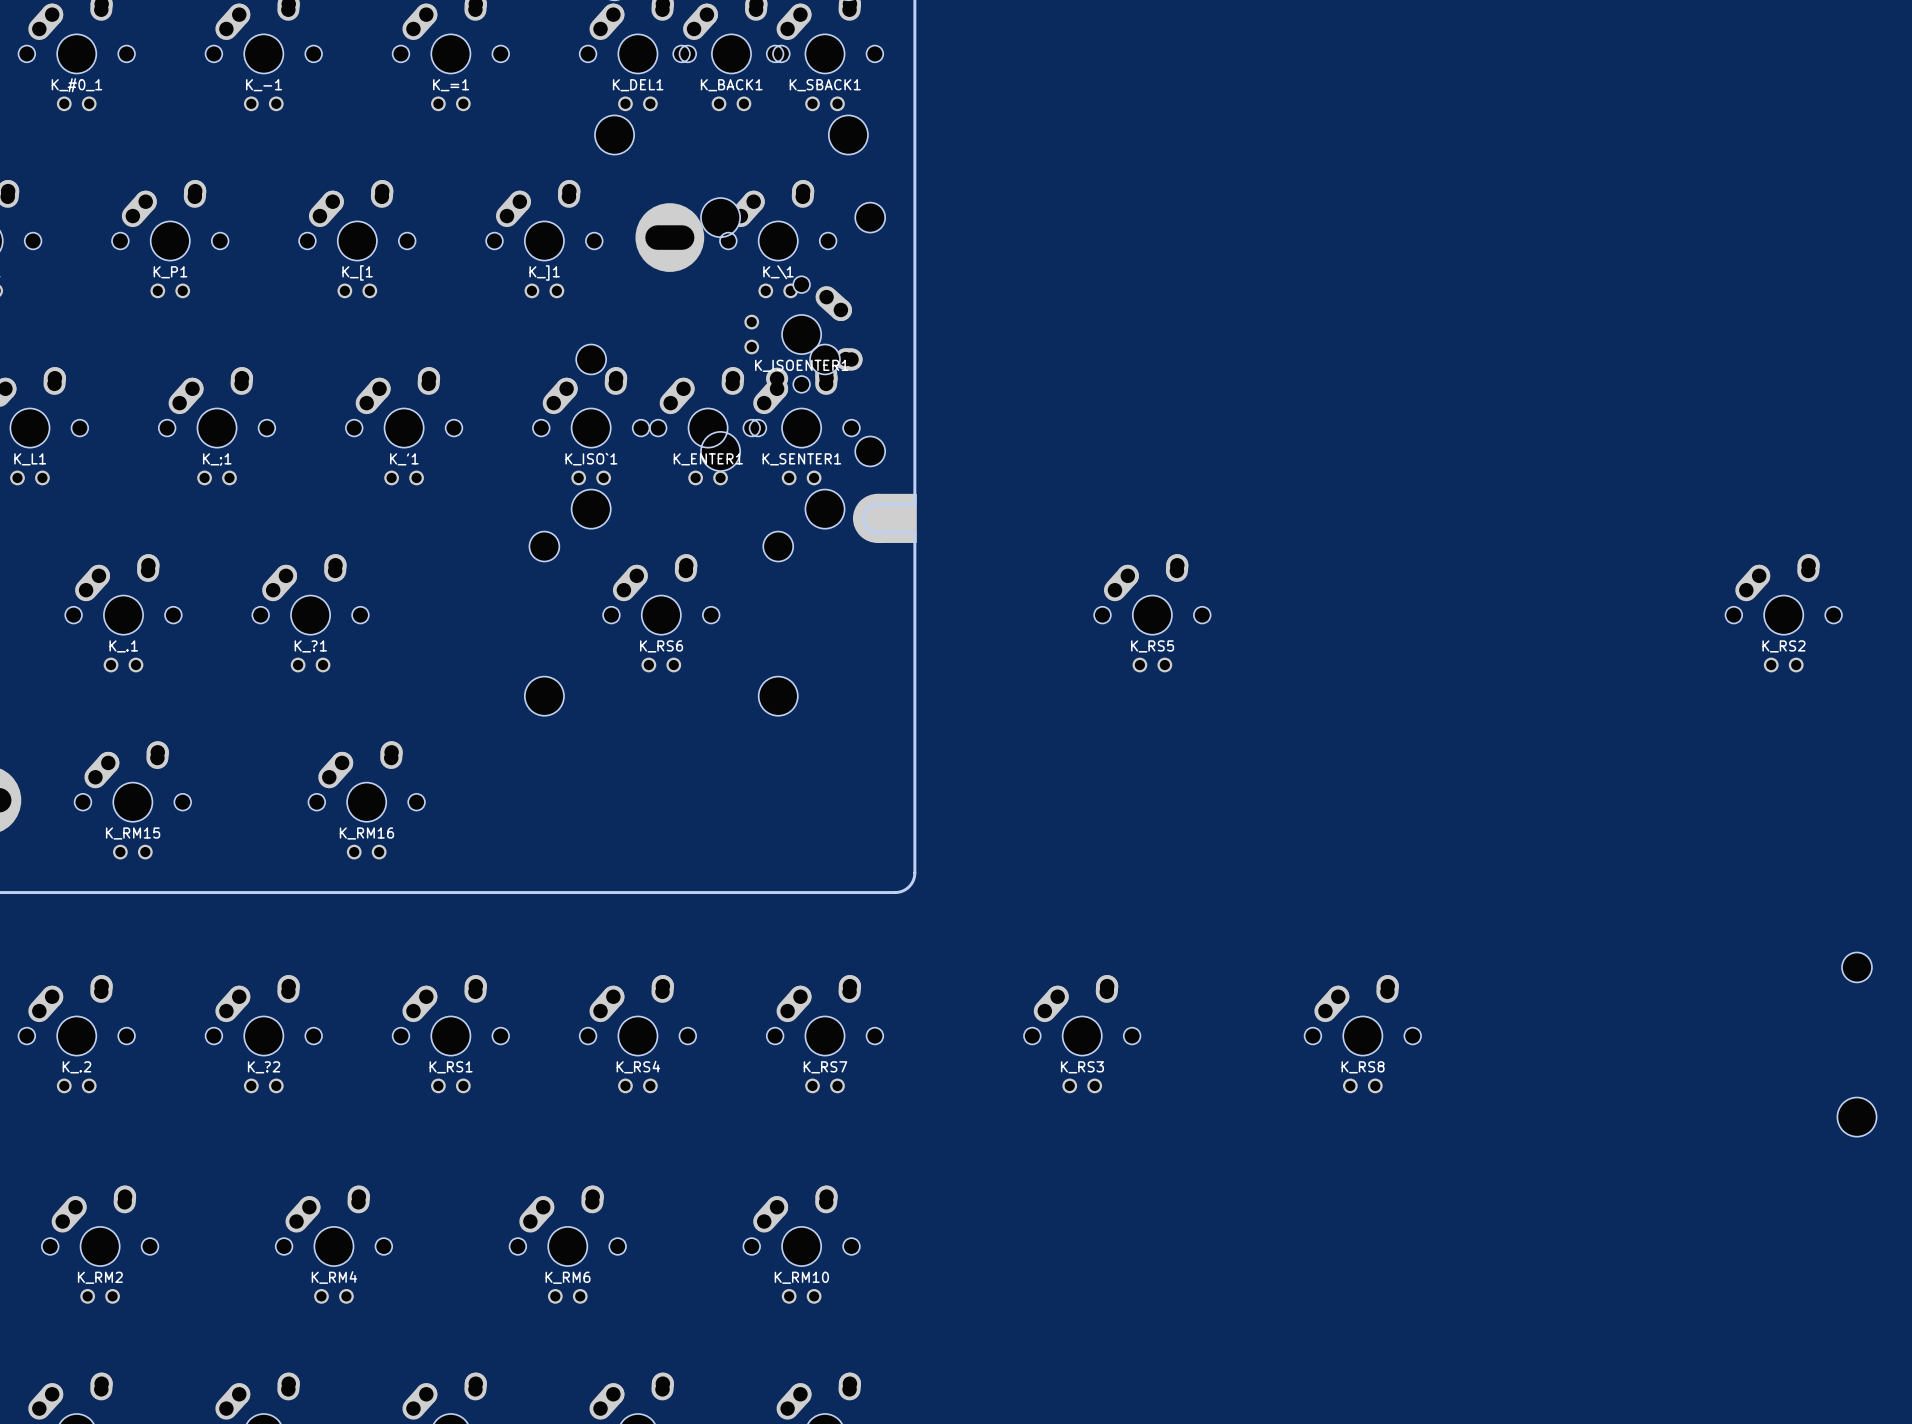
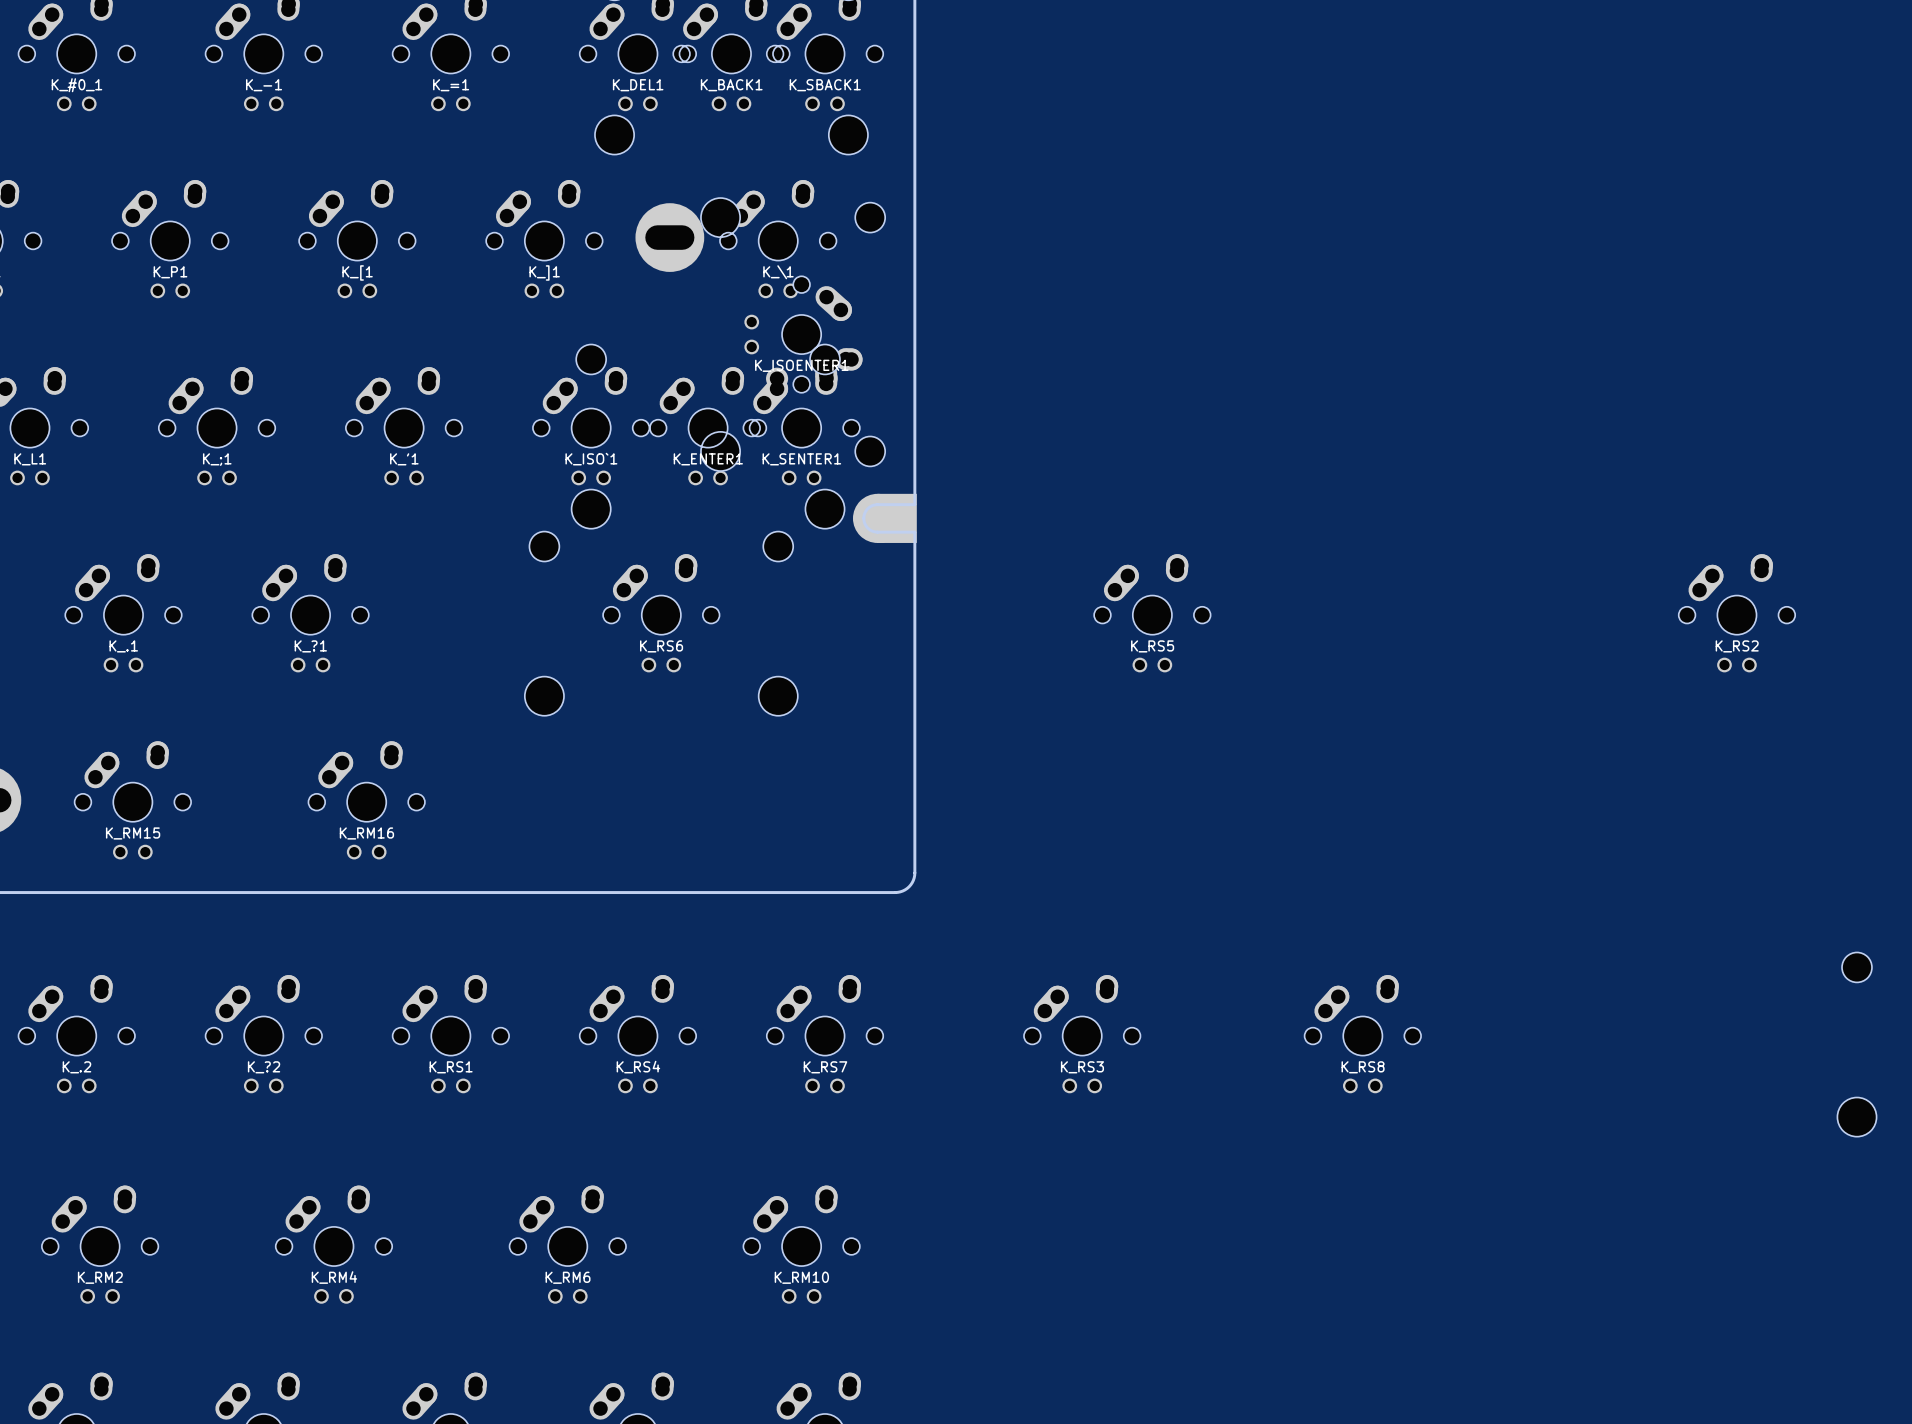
K_RS2 position: (1783, 613) -> (1736, 613)

